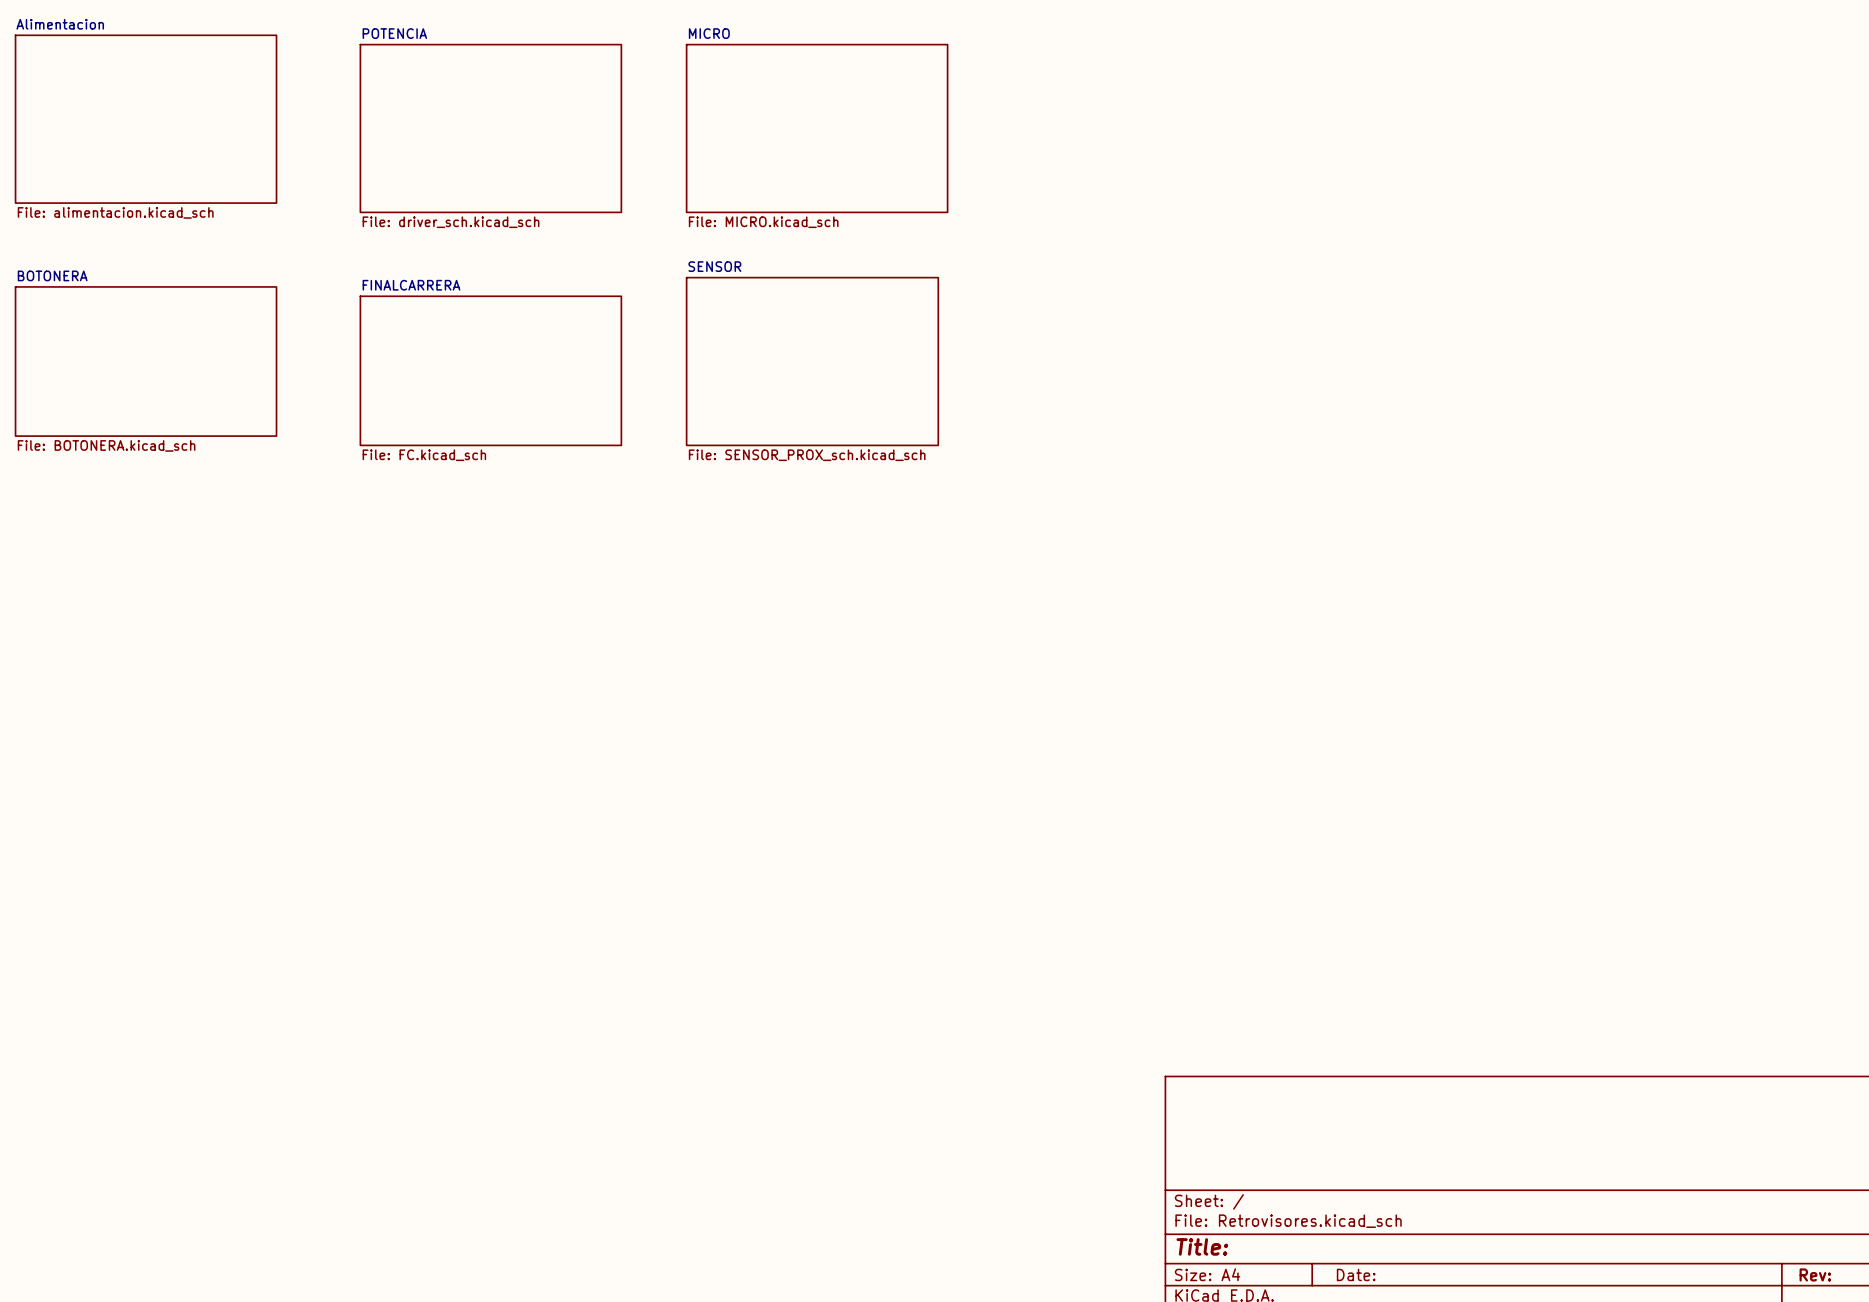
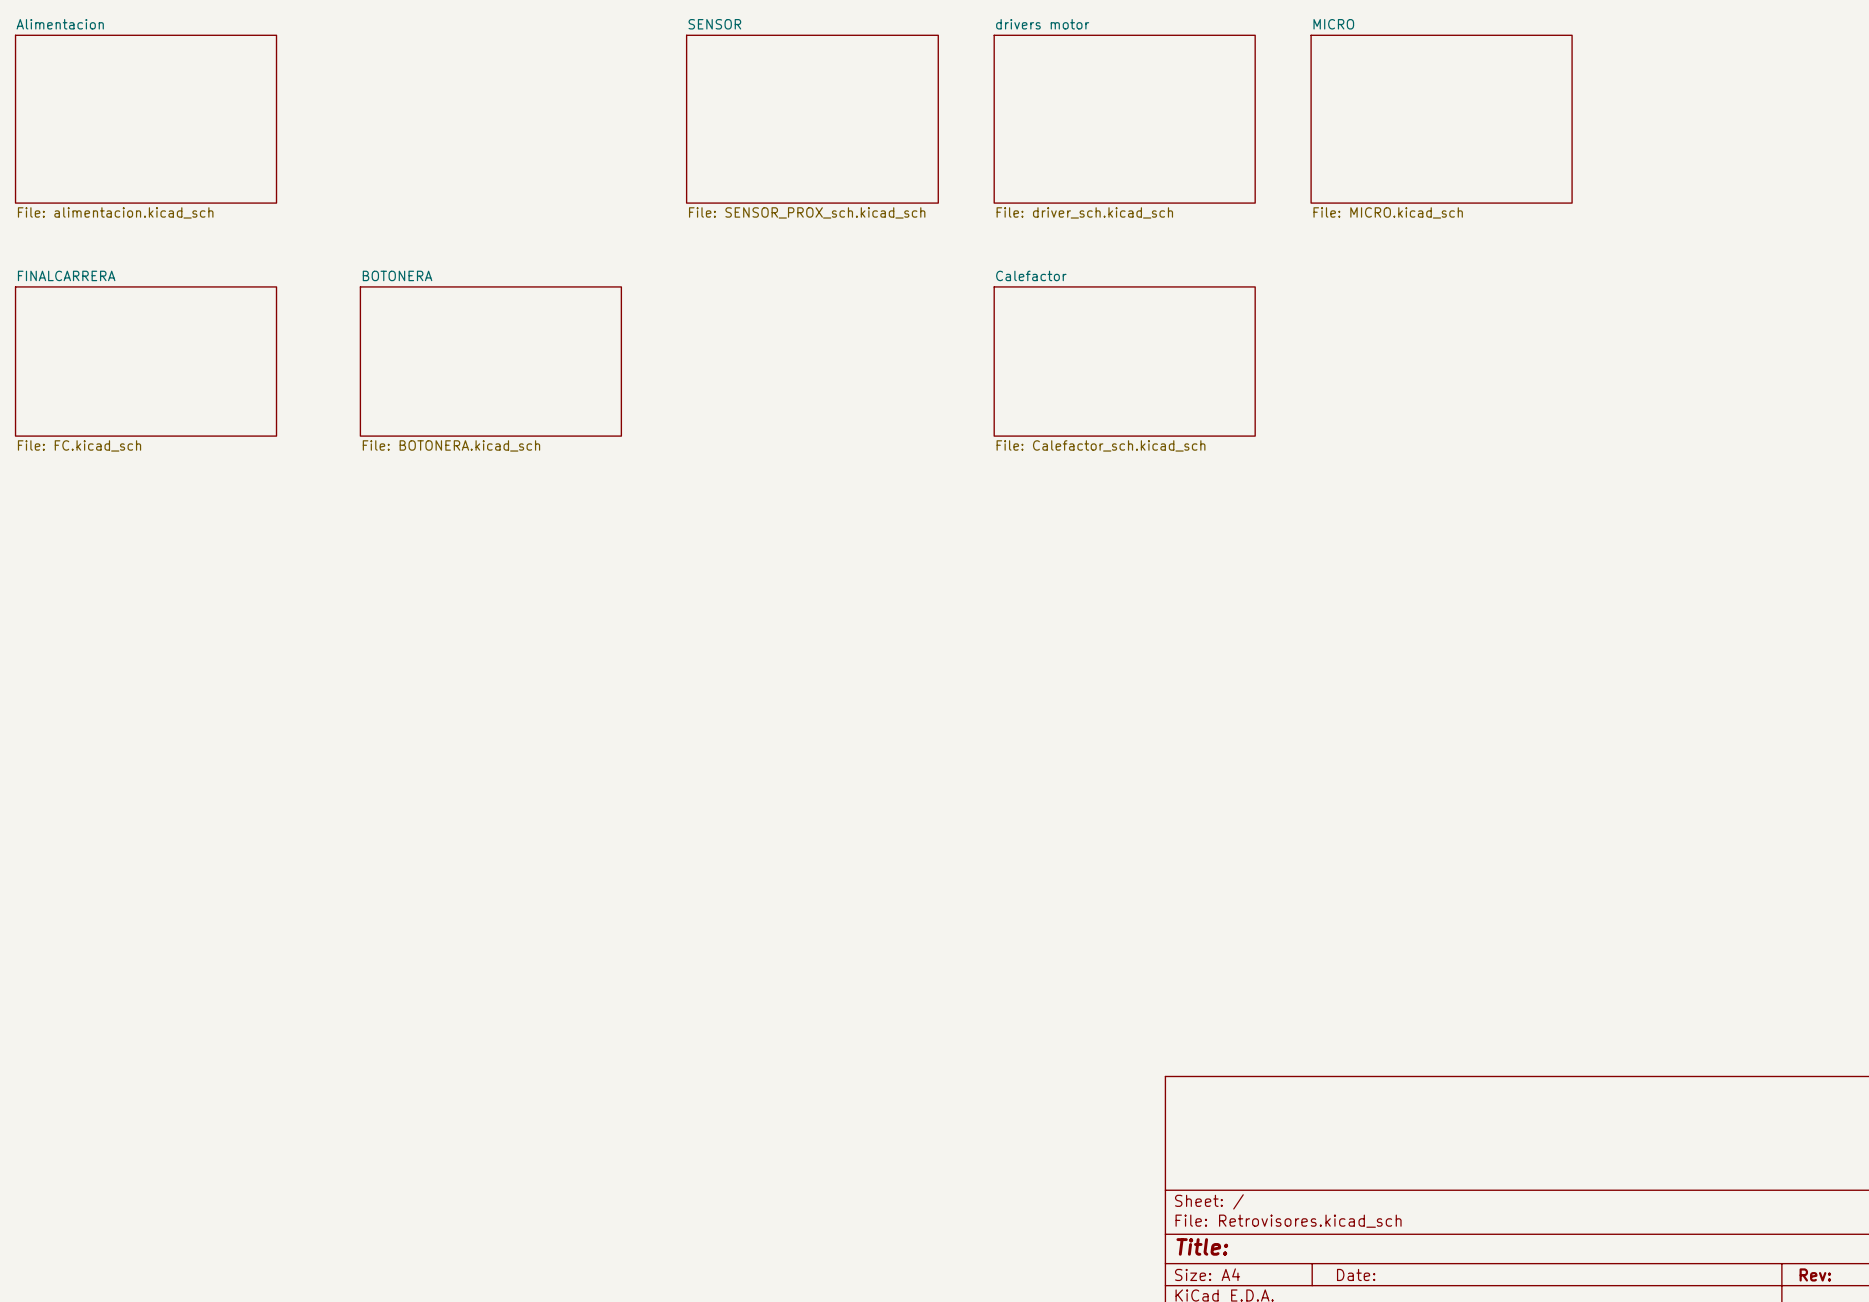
sheet SENSOR: none -> File: SENSOR_PROX_sch.kicad_sch (812, 119)
sheet drivers motor: none -> File: driver_sch.kicad_sch (1124, 119)
sheet MICRO: none -> File: MICRO.kicad_sch (1441, 119)
sheet POTENCIA: File: driver_sch.kicad_sch (490, 128) -> none
sheet MICRO: File: MICRO.kicad_sch (817, 128) -> none
sheet BOTONERA name: BOTONERA (52, 275) -> FINALCARRERA (66, 275)
sheet BOTONERA: none -> File: BOTONERA.kicad_sch (490, 361)
sheet SENSOR: File: SENSOR_PROX_sch.kicad_sch (812, 361) -> none
sheet Calefactor: none -> File: Calefactor_sch.kicad_sch (1124, 361)
sheet FINALCARRERA: File: FC.kicad_sch (490, 370) -> none
sheet BOTONERA value: File: BOTONERA.kicad_sch (106, 445) -> File: FC.kicad_sch (79, 445)

